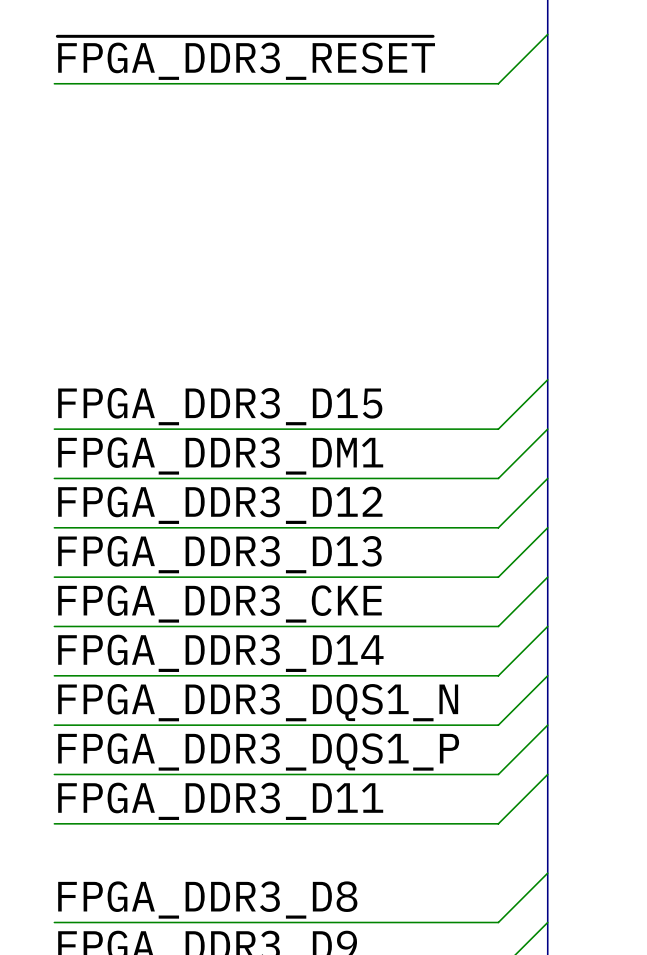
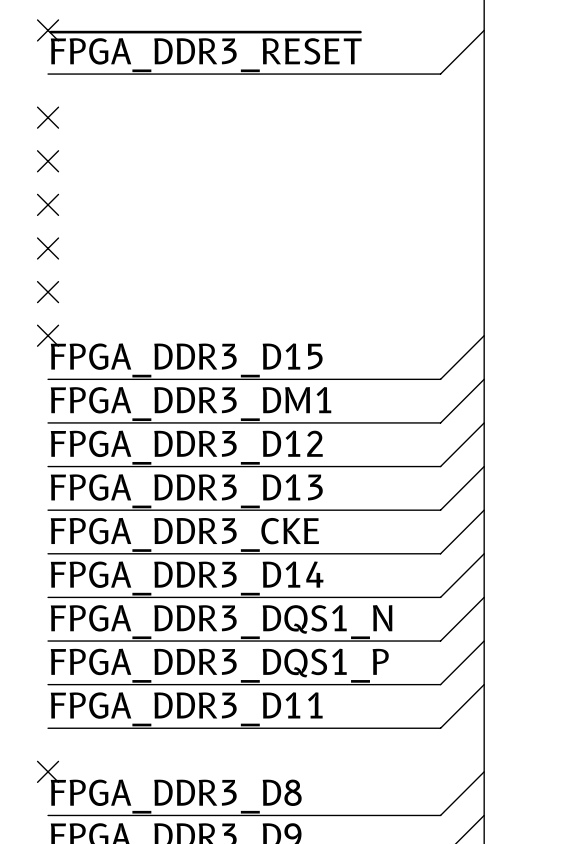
no-connect mark: none -> (48, 30)
no-connect mark: none -> (48, 117)
no-connect mark: none -> (48, 161)
no-connect mark: none -> (48, 204)
no-connect mark: none -> (48, 248)
no-connect mark: none -> (48, 292)
no-connect mark: none -> (48, 335)
no-connect mark: none -> (48, 771)

